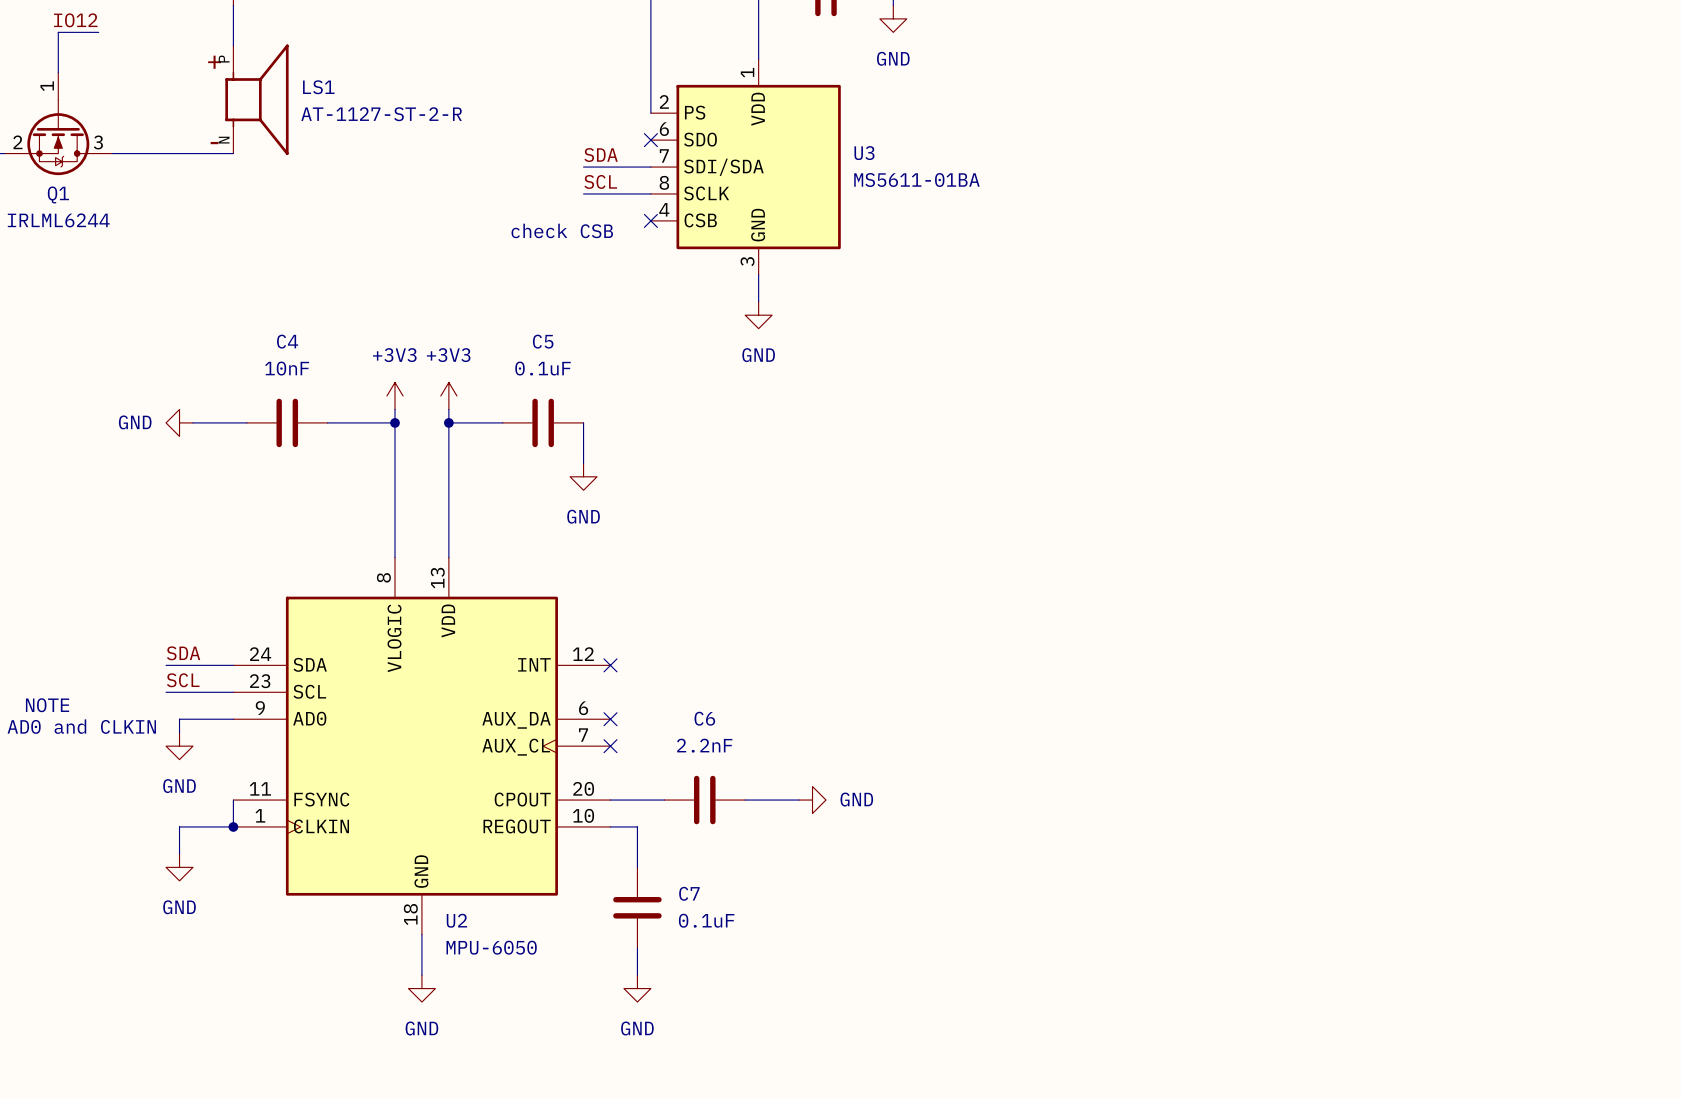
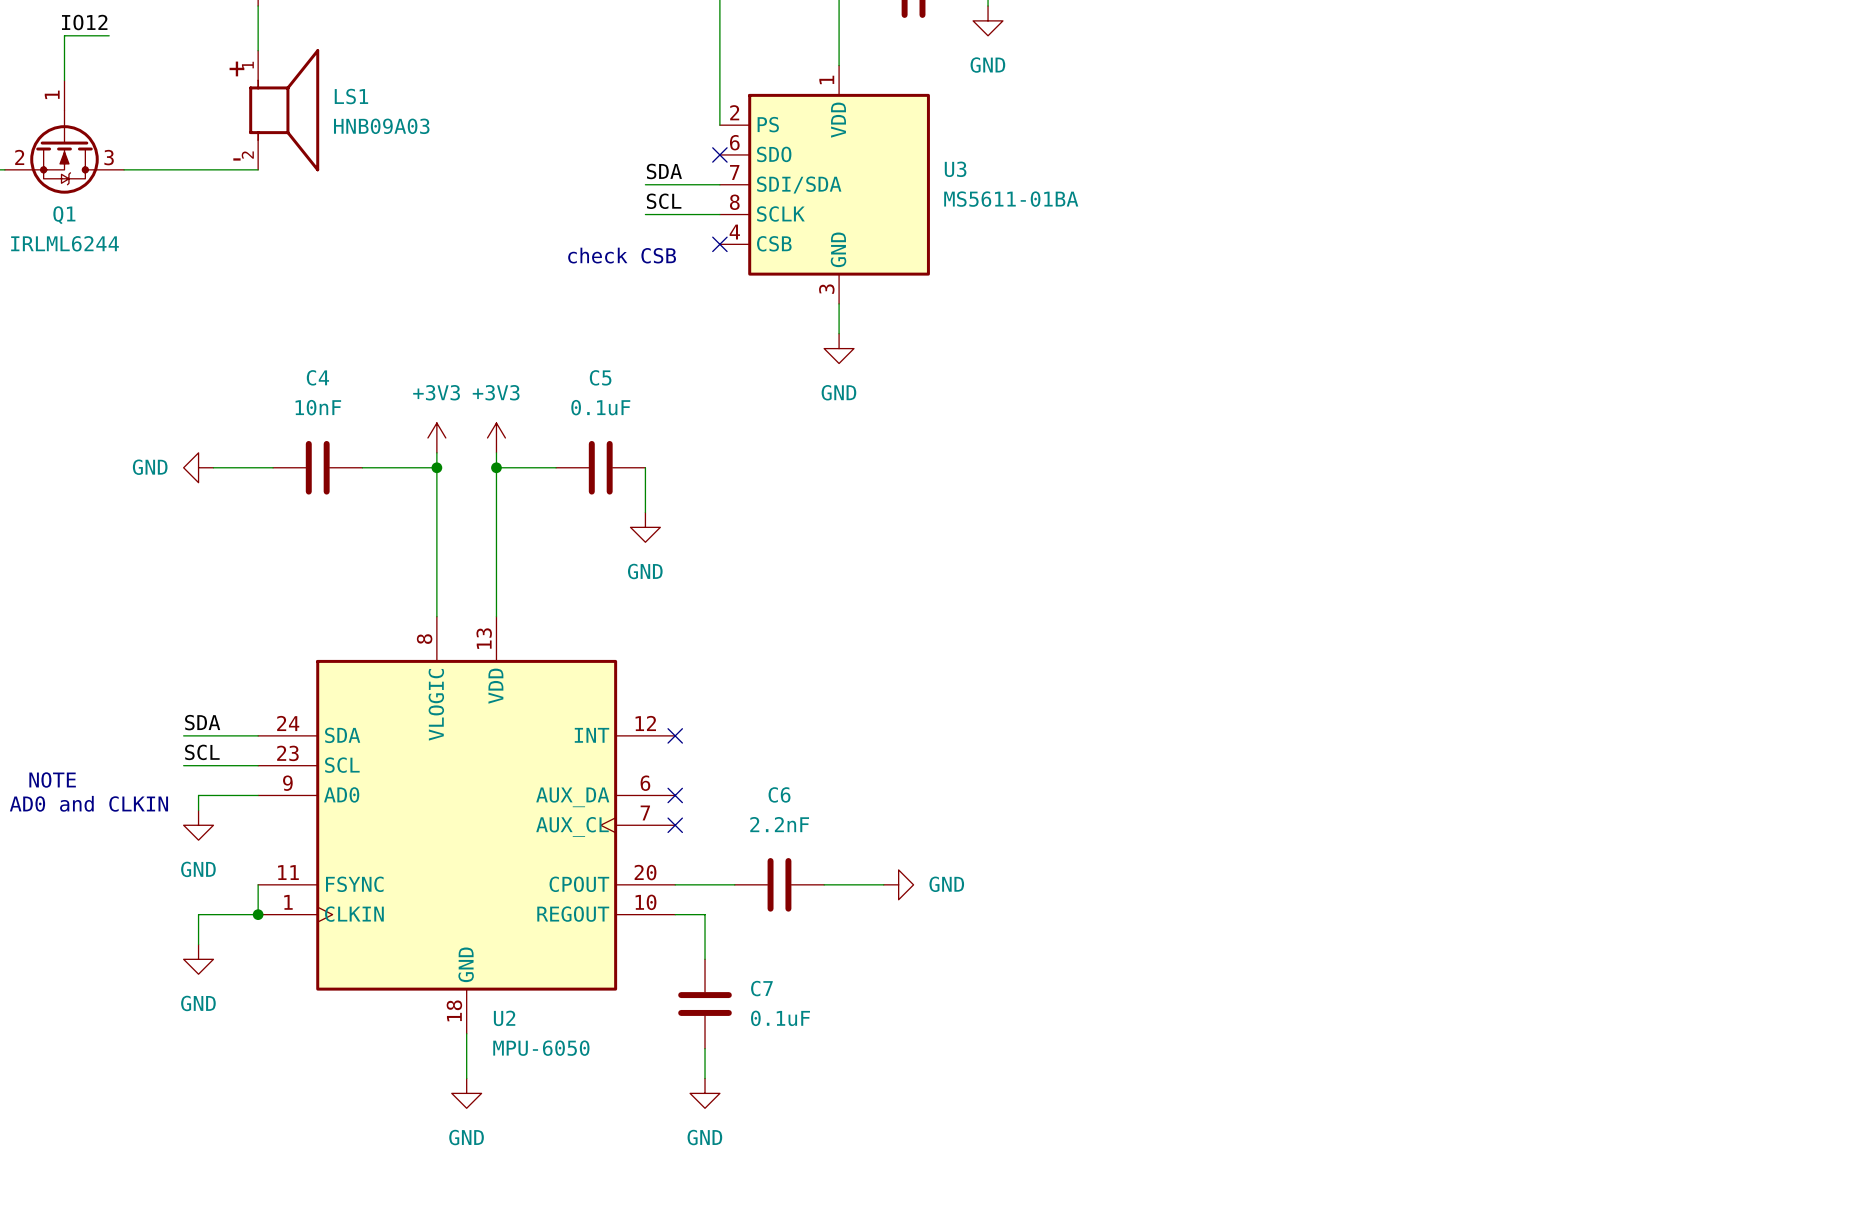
LS1 pin number: P (224, 59) -> 1 (247, 65)
LS1 value: AT-1127-ST-2-R (381, 114) -> HNB09A03 (381, 126)
LS1 pin number: N (224, 140) -> 2 (247, 155)

